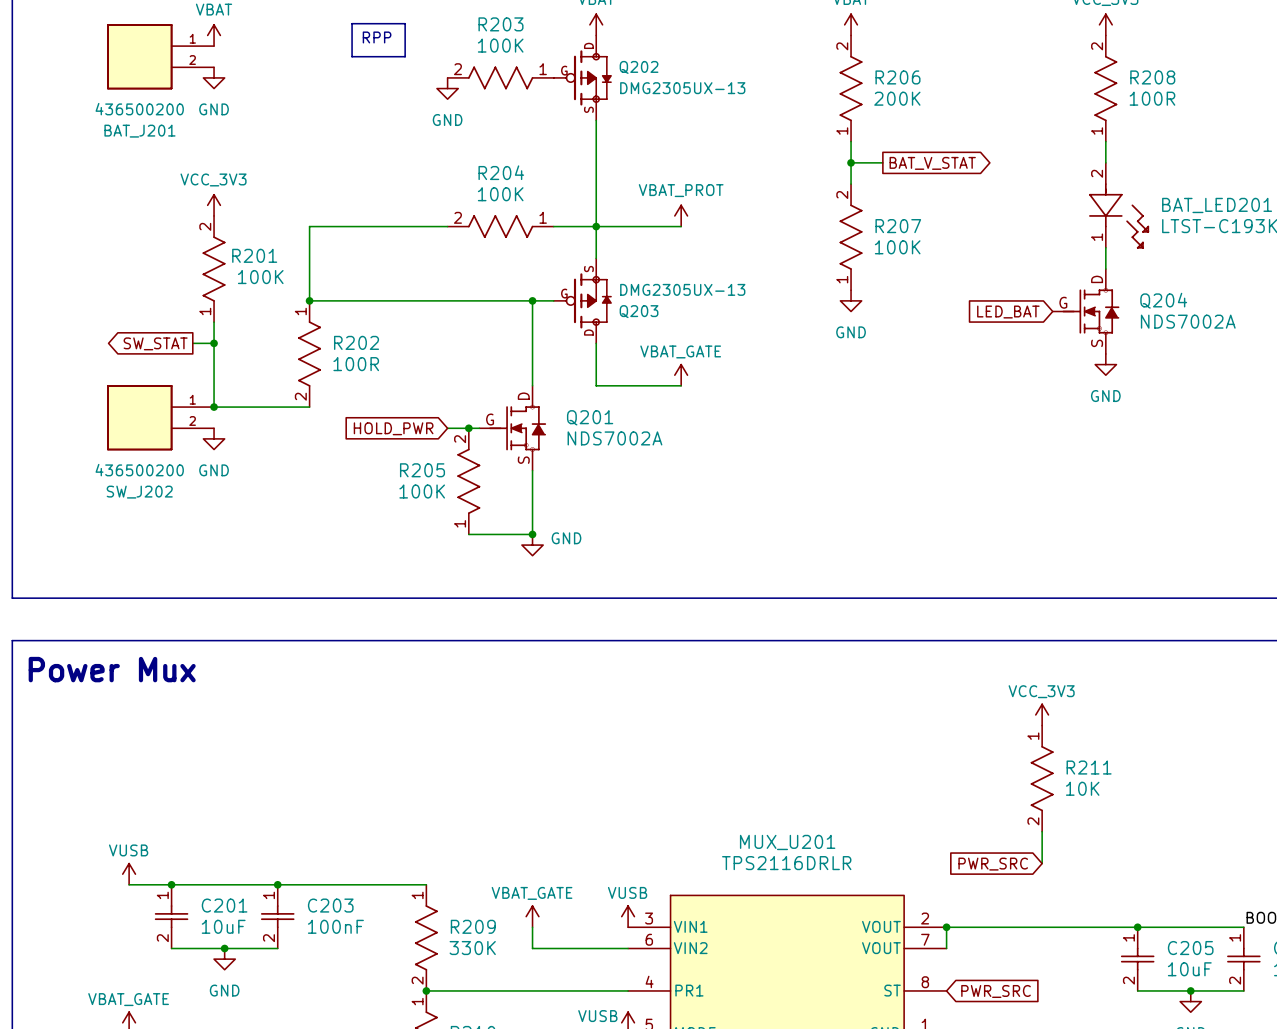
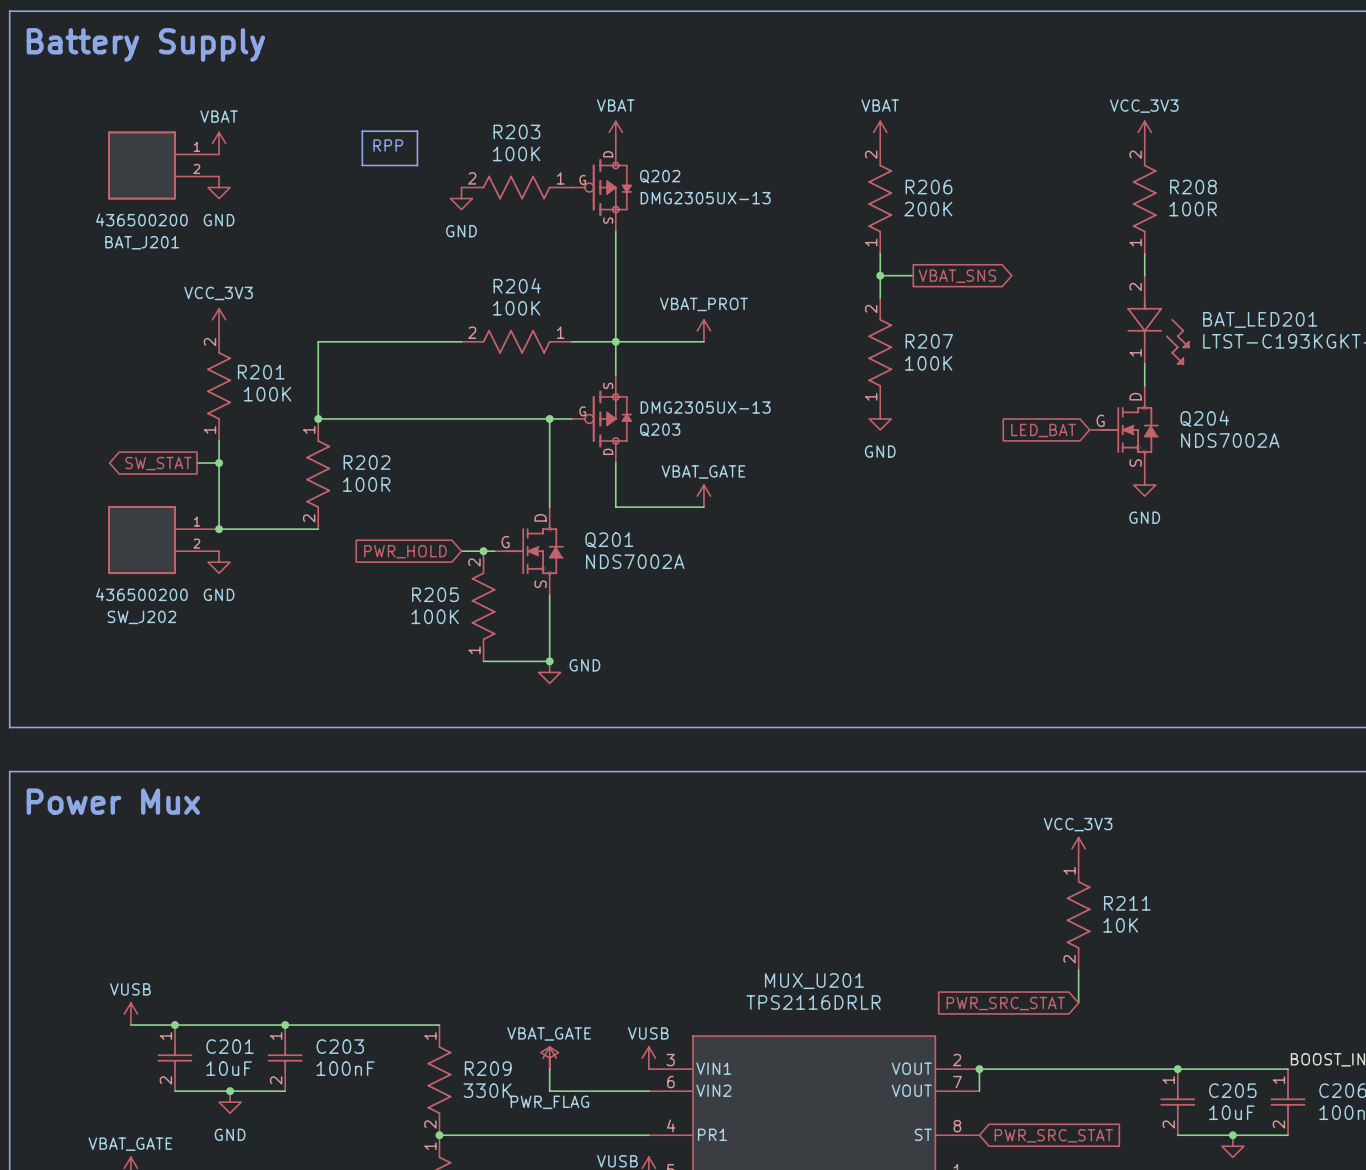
global label: BAT_V_STAT (932, 163) -> VBAT_SNS (957, 276)
global label: HOLD_PWR (393, 428) -> PWR_HOLD (405, 551)
global label: PWR_SRC (993, 864) -> PWR_SRC_STAT (1005, 1003)
power symbol: none -> PWR_FLAG (549, 1058)
global label: PWR_SRC (996, 991) -> PWR_SRC_STAT (1053, 1135)

